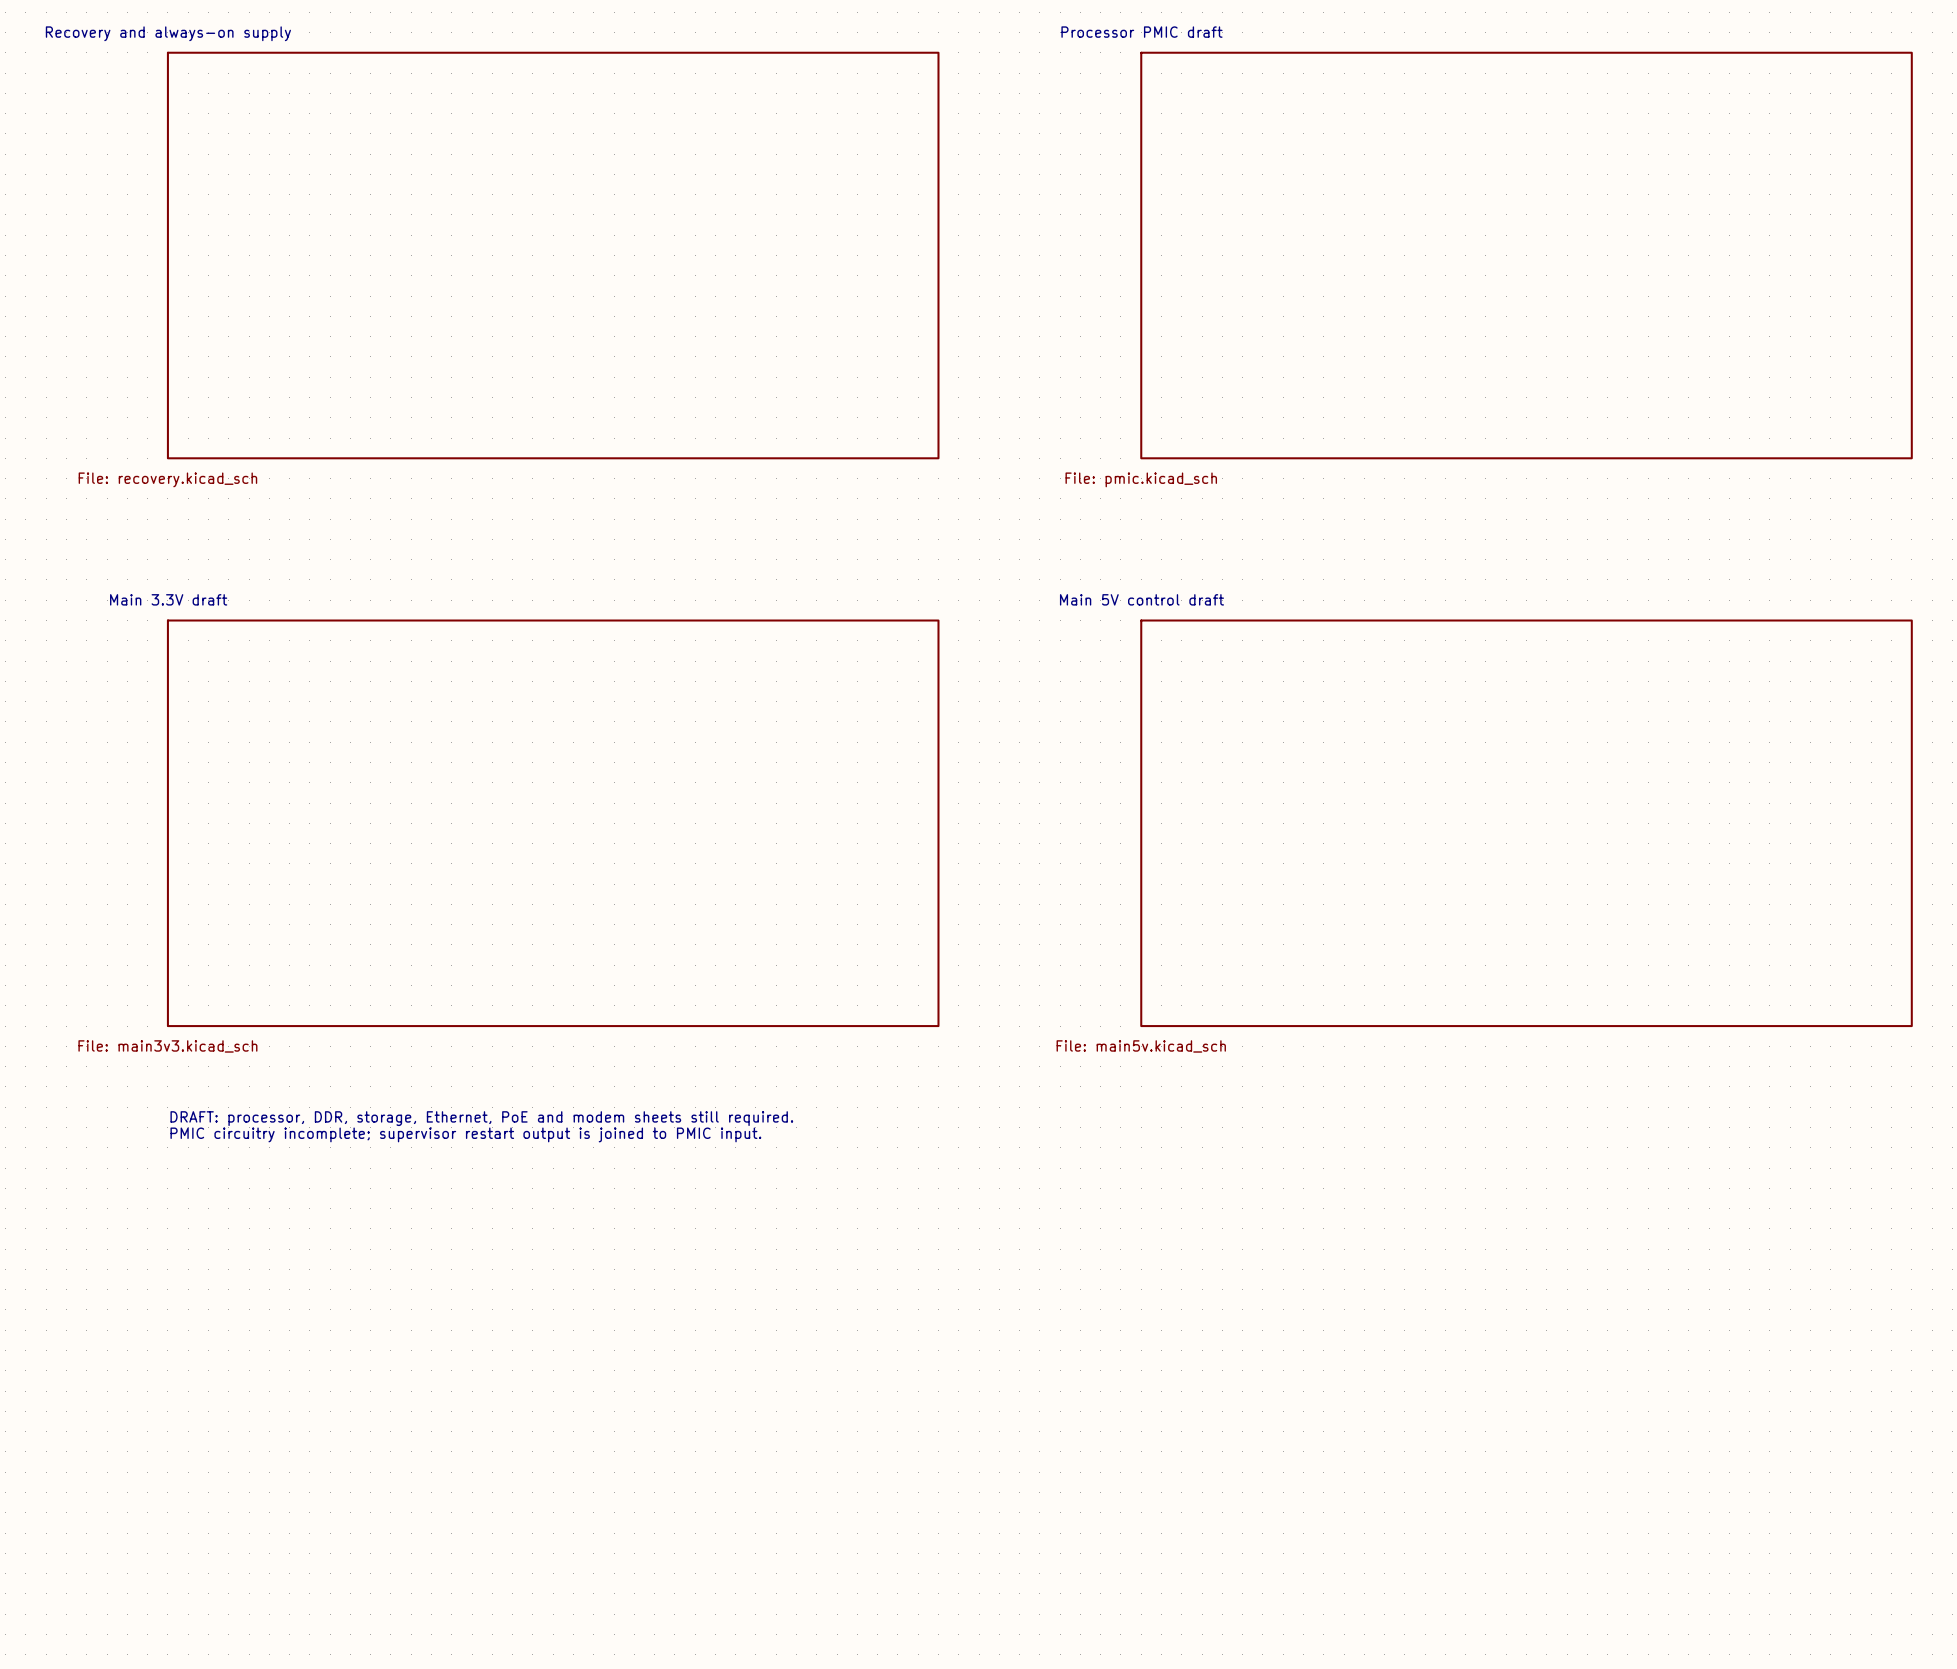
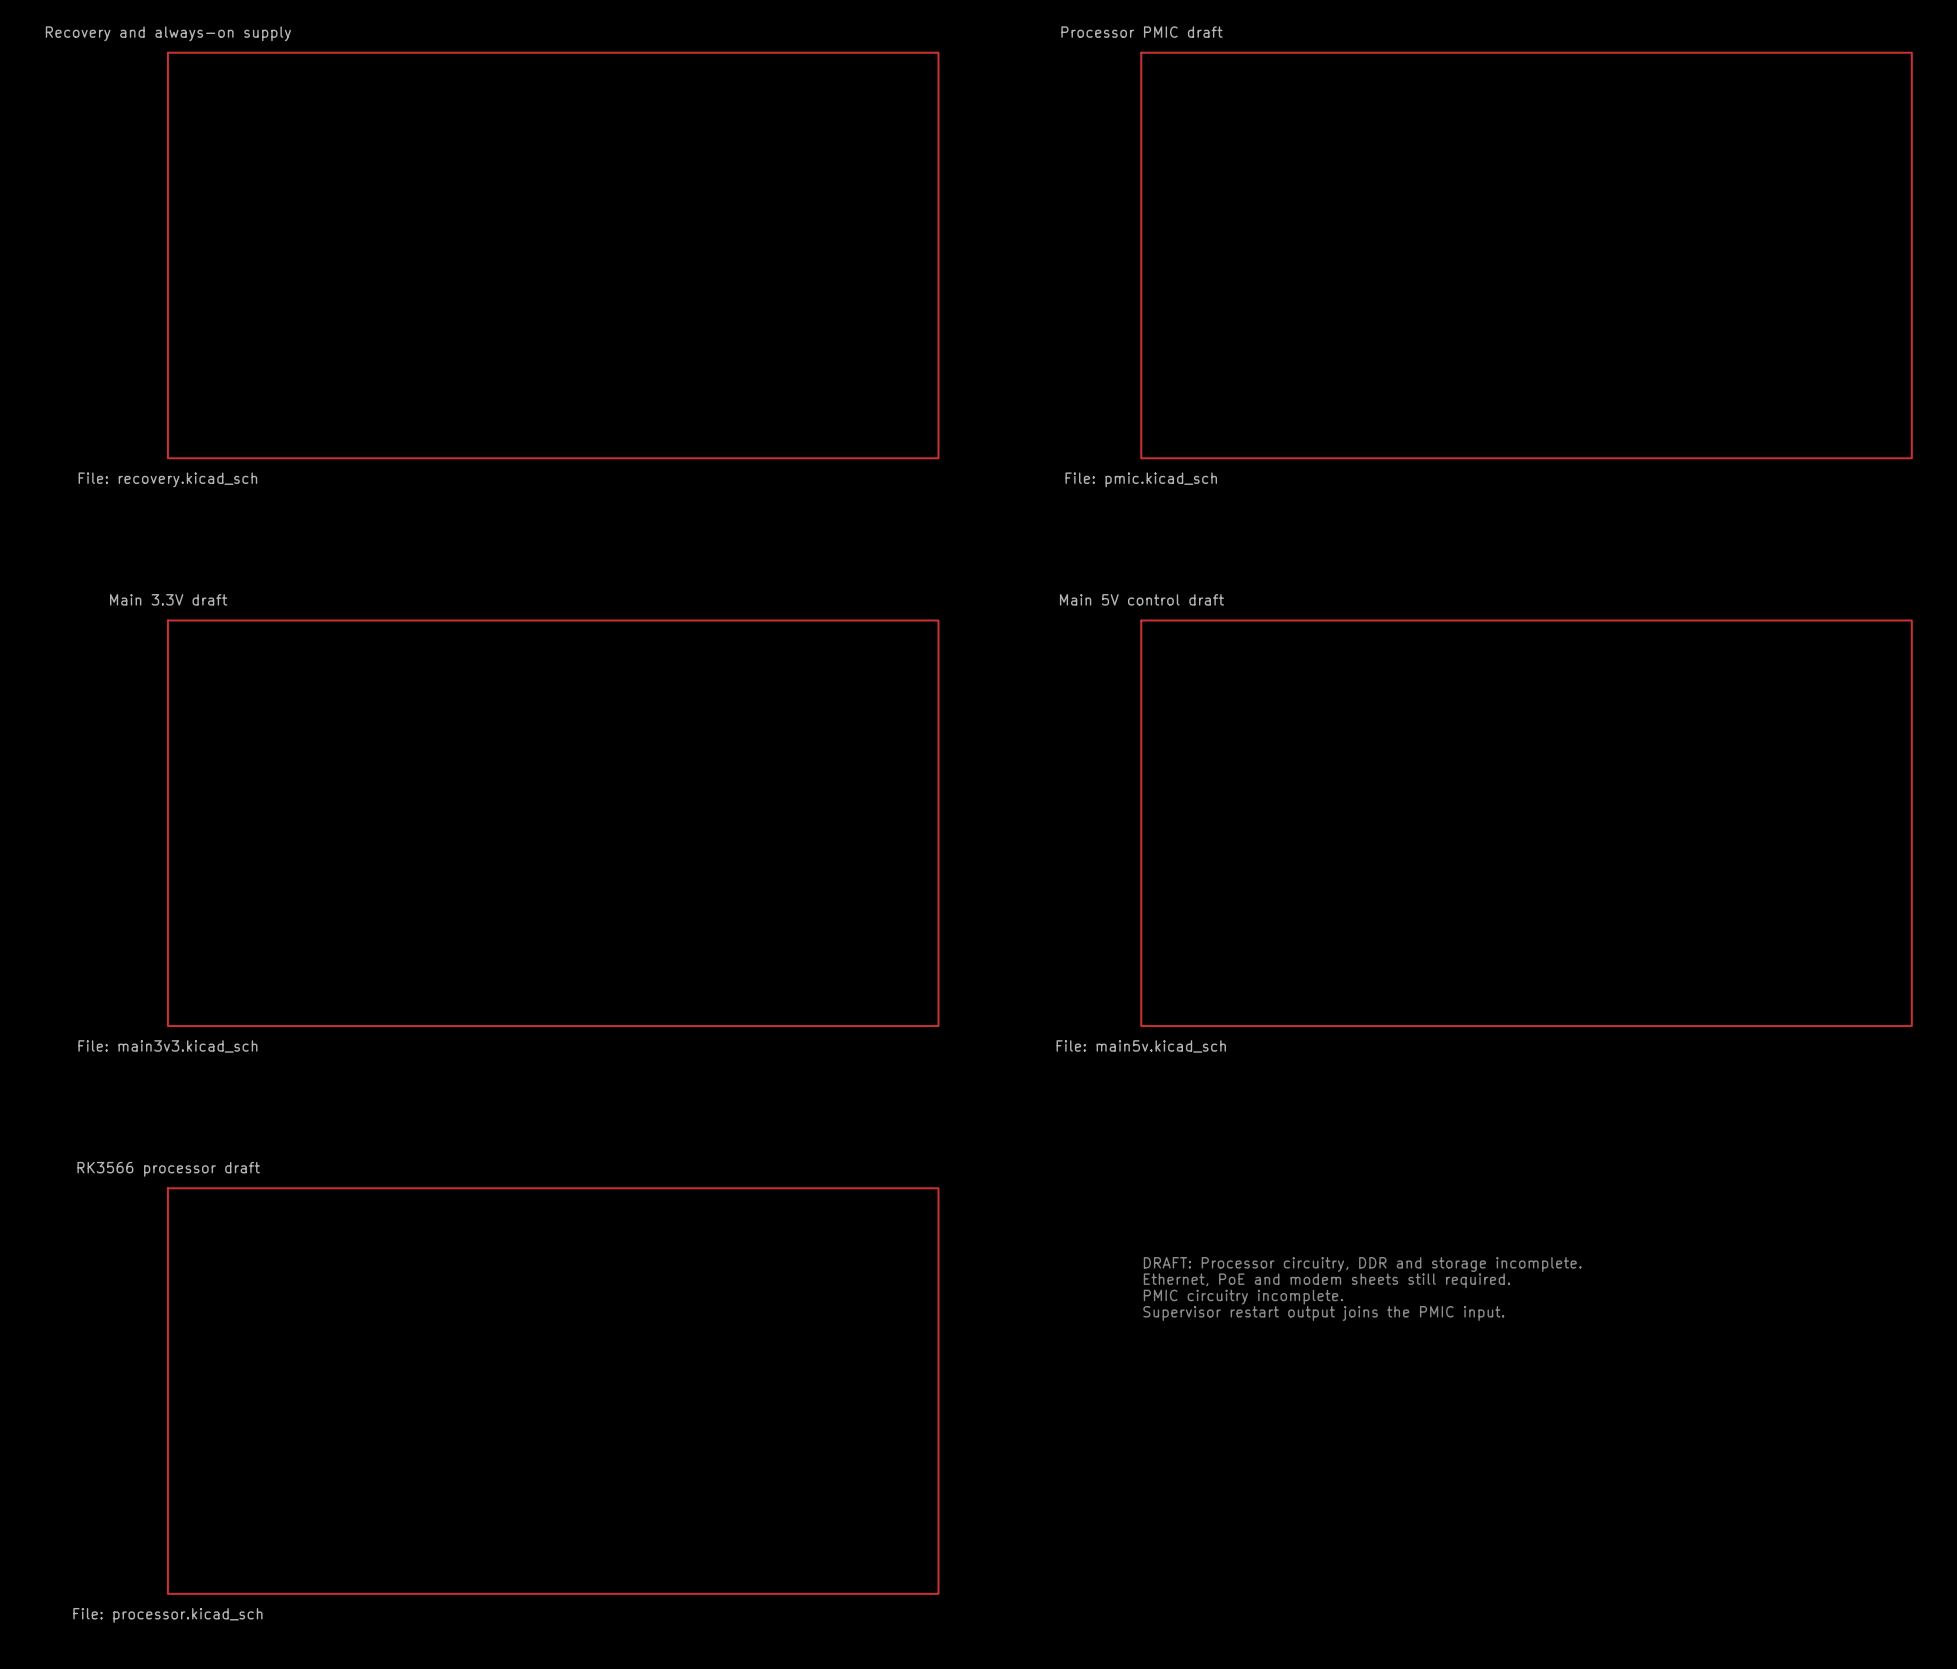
text: DRAFT: processor, DDR, storage, Ethernet, PoE and modem sheets still required. (481, 1118) -> none
text: PMIC circuitry incomplete; supervisor restart output is joined to PMIC input. (465, 1134) -> none
text: none -> DRAFT: Processor circuitry, DDR and storage incomplete. (1362, 1264)
text: none -> Ethernet, PoE and modem sheets still required. (1326, 1280)
text: none -> PMIC circuitry incomplete. (1243, 1297)
text: none -> Supervisor restart output joins the PMIC input. (1323, 1313)
sheet RK3566 processor draft: none -> File: processor.kicad_sch (553, 1391)

